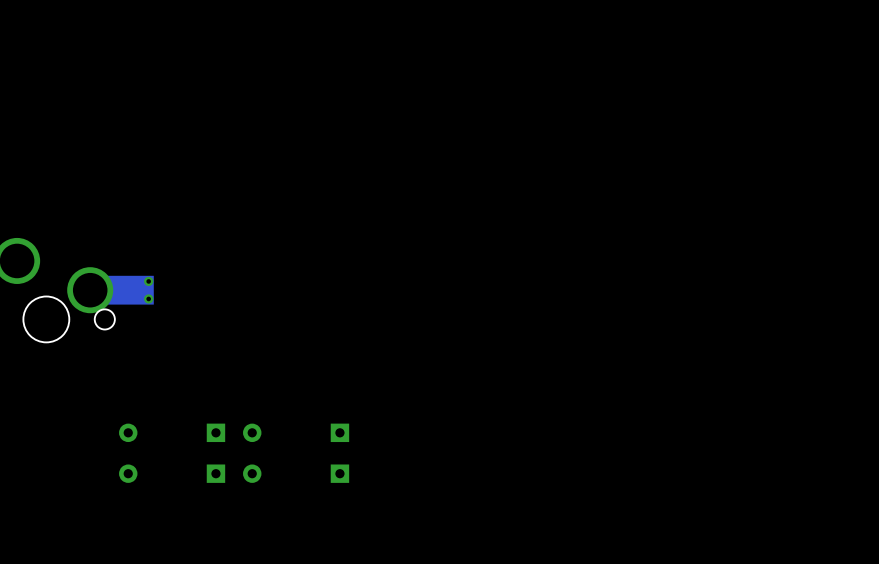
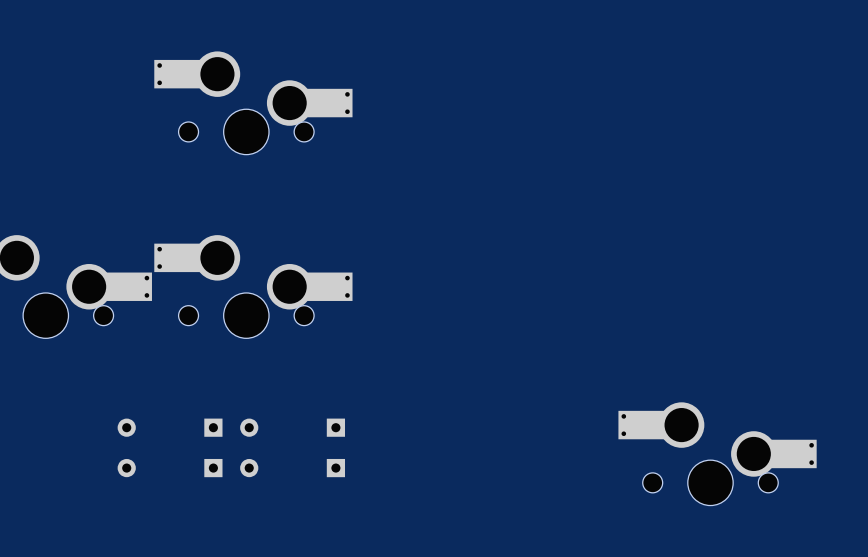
part: none -> (253, 103)
part: none -> (253, 286)
part: none -> (717, 453)

